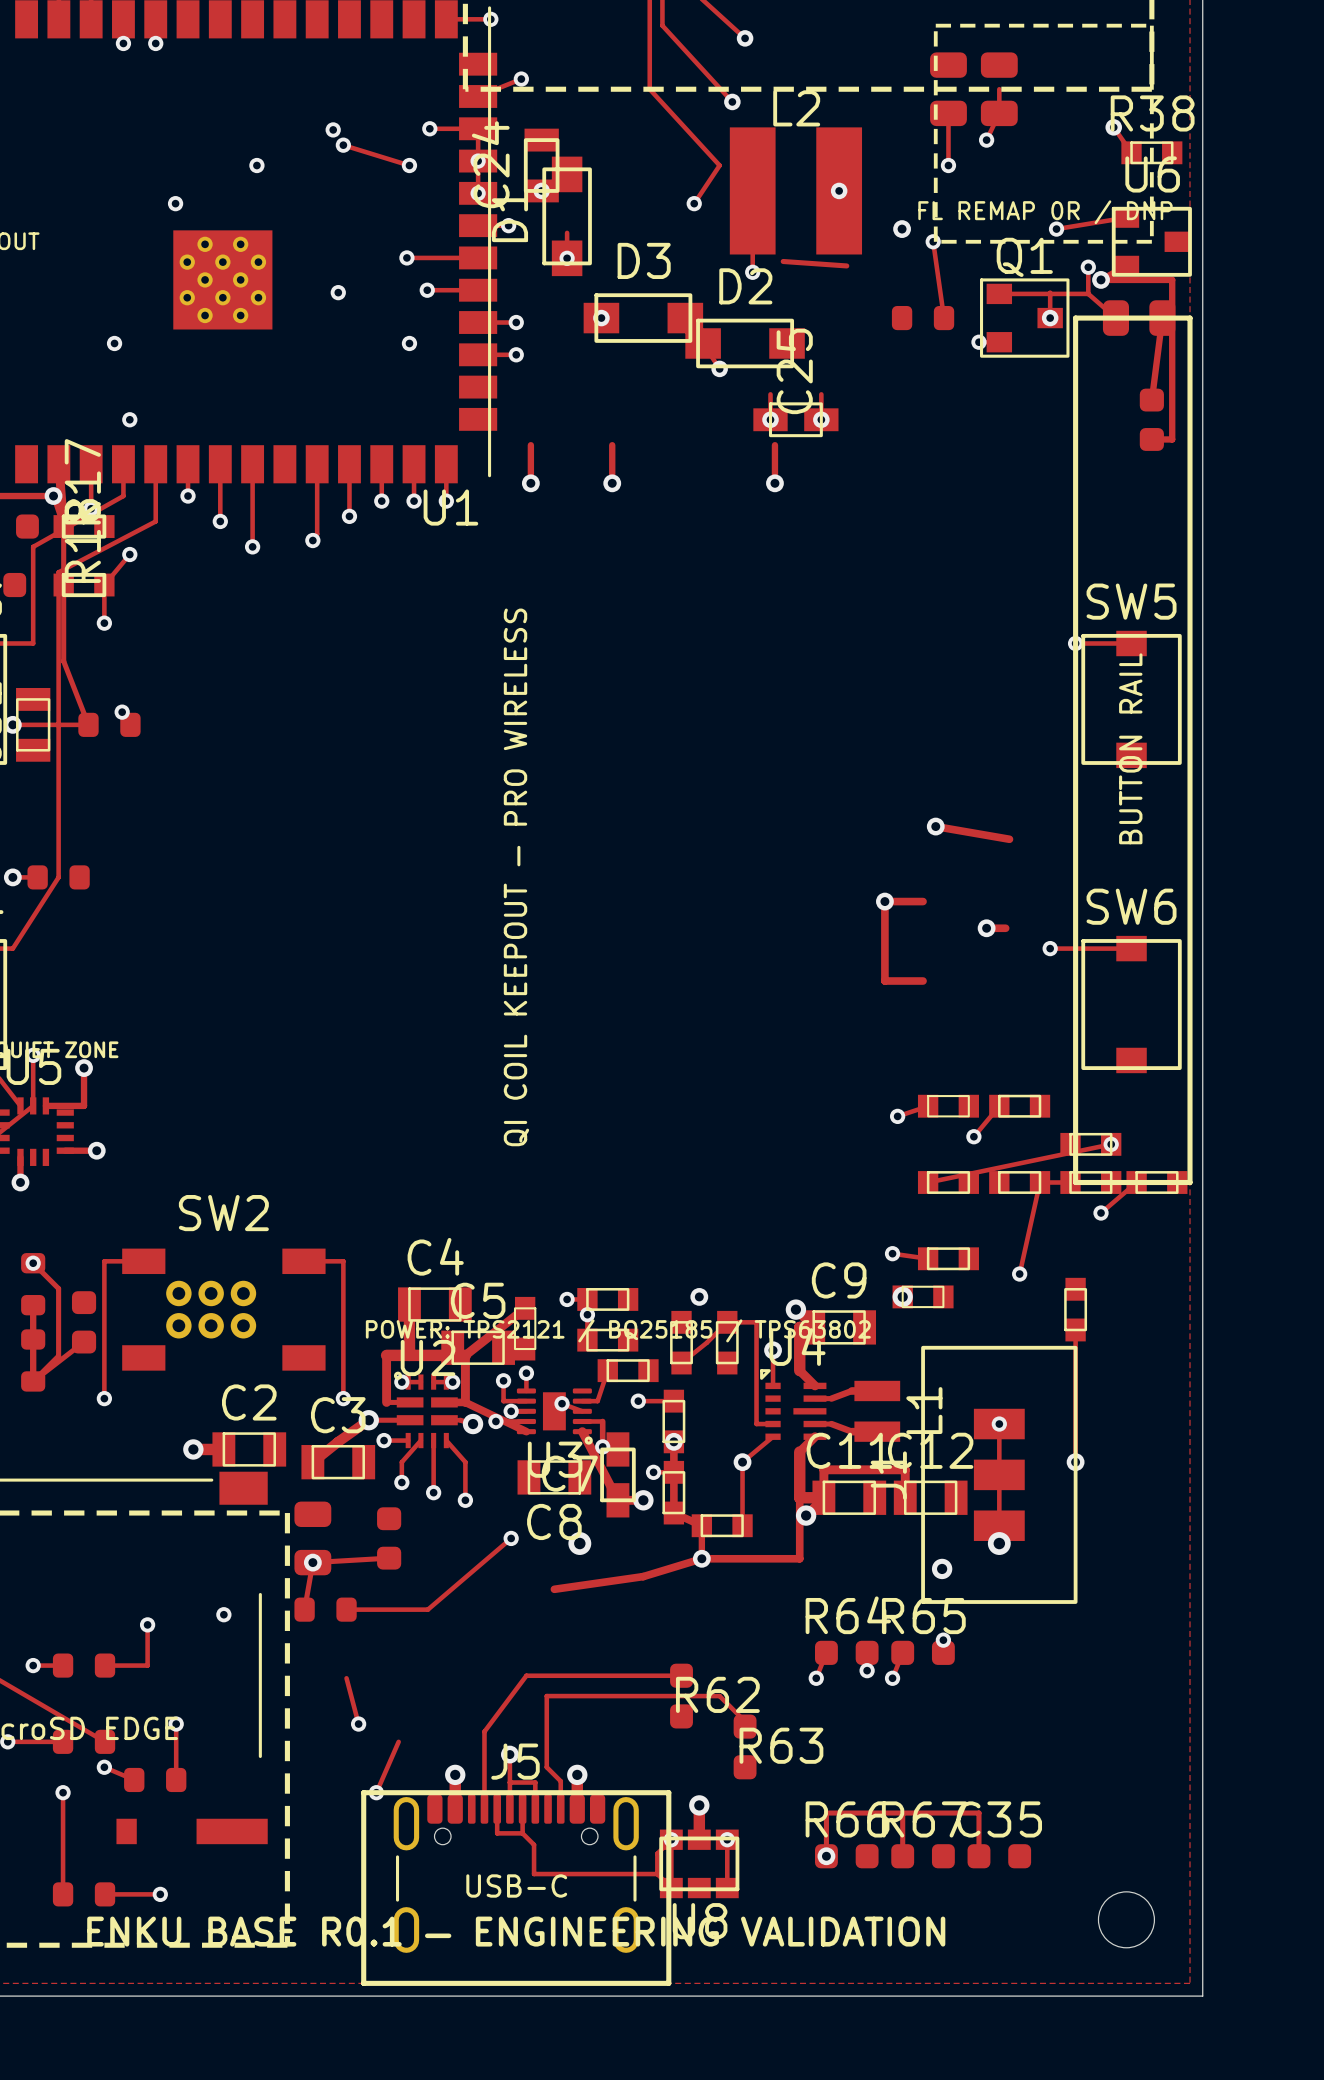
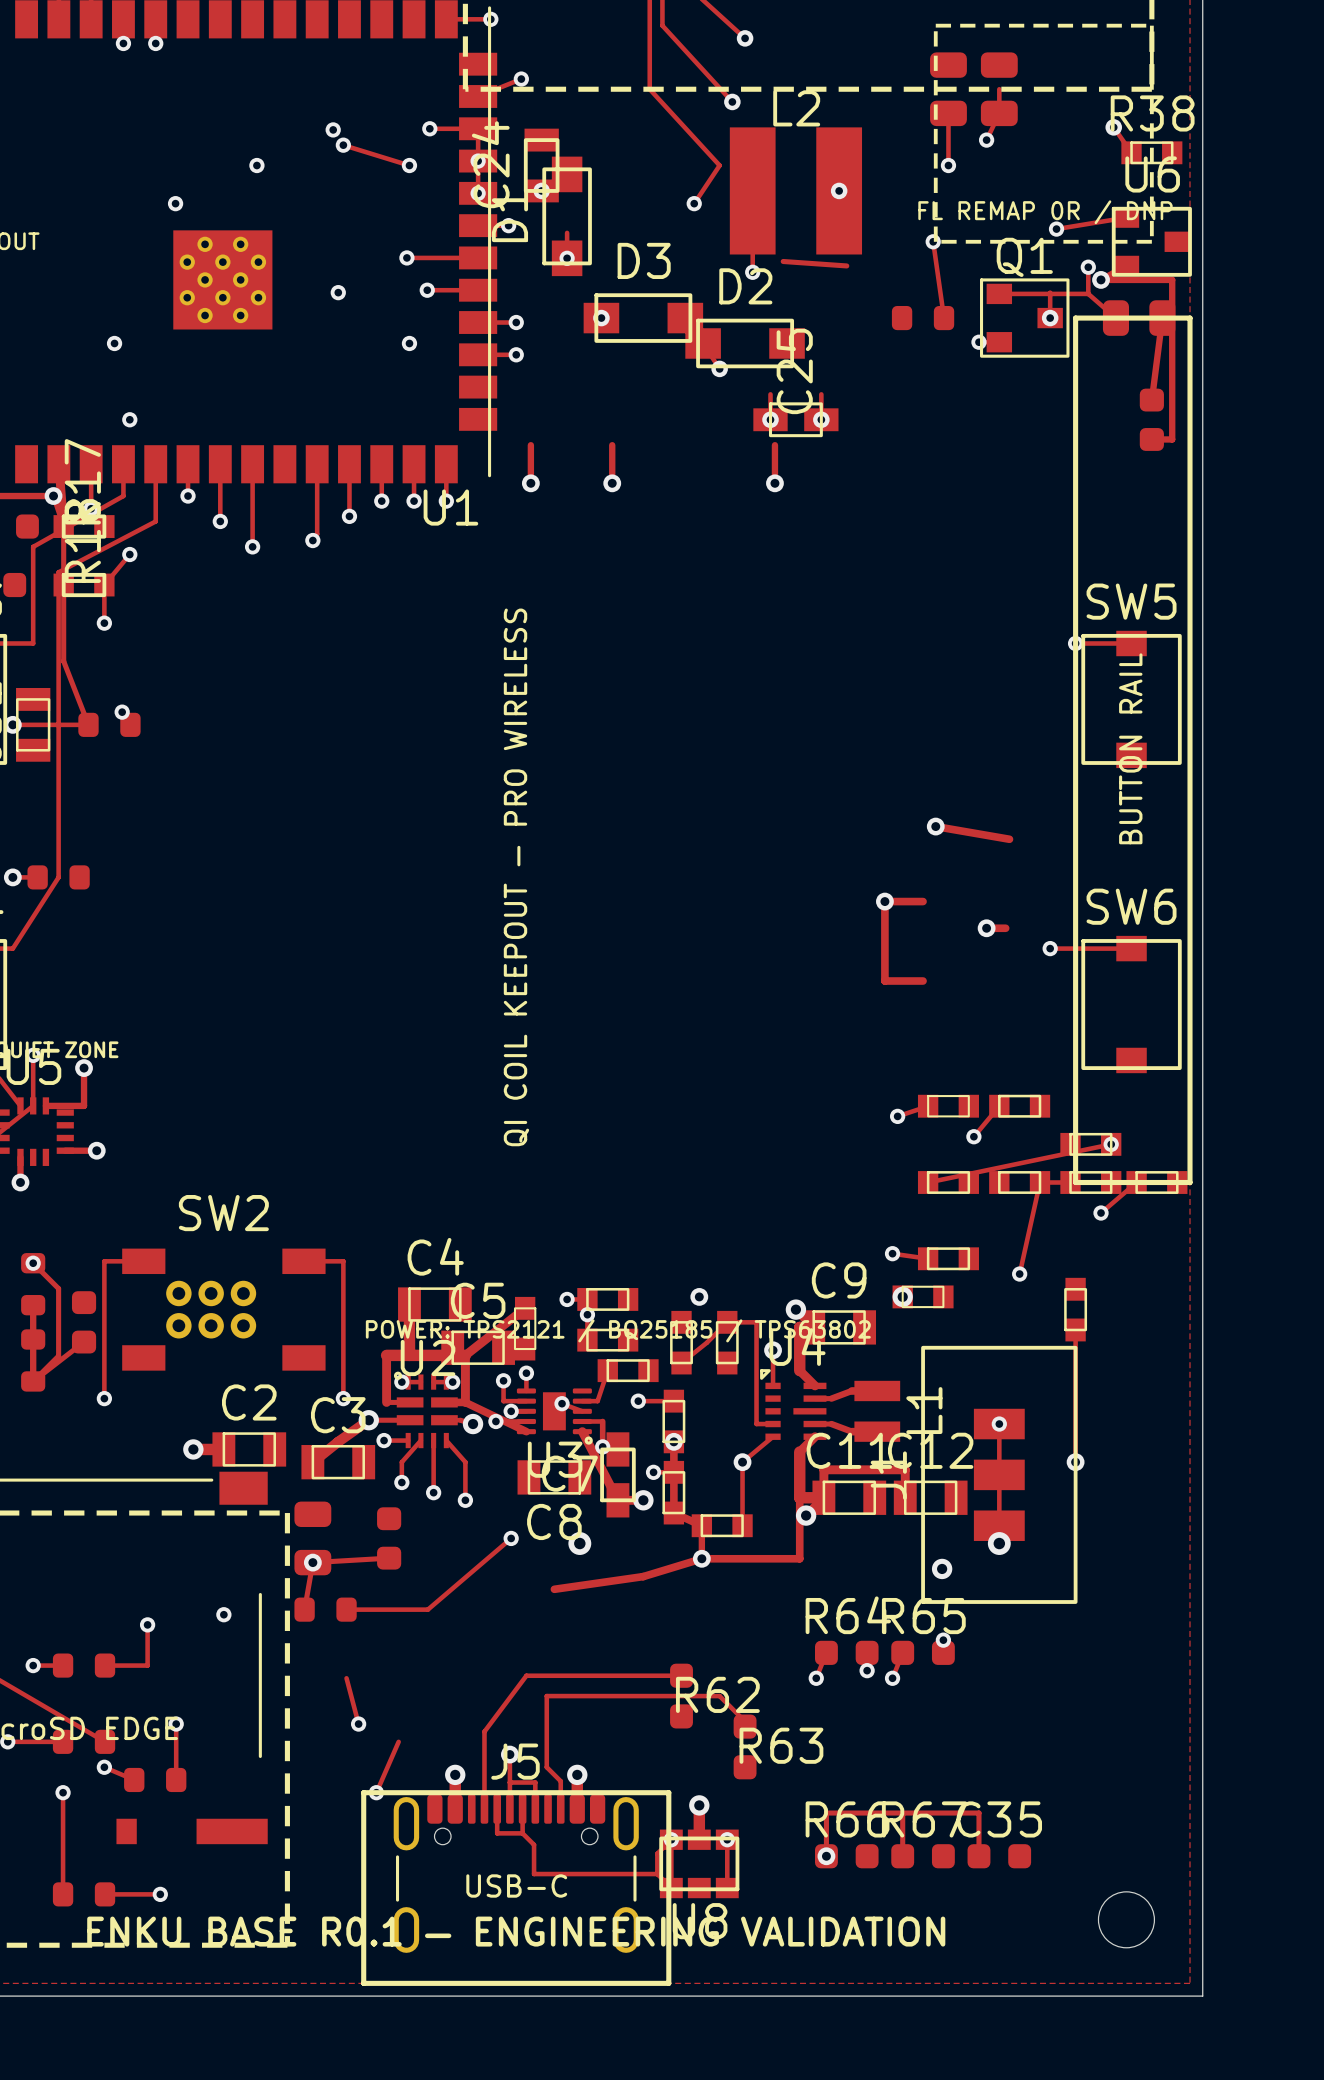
via: (902, 229) -> none

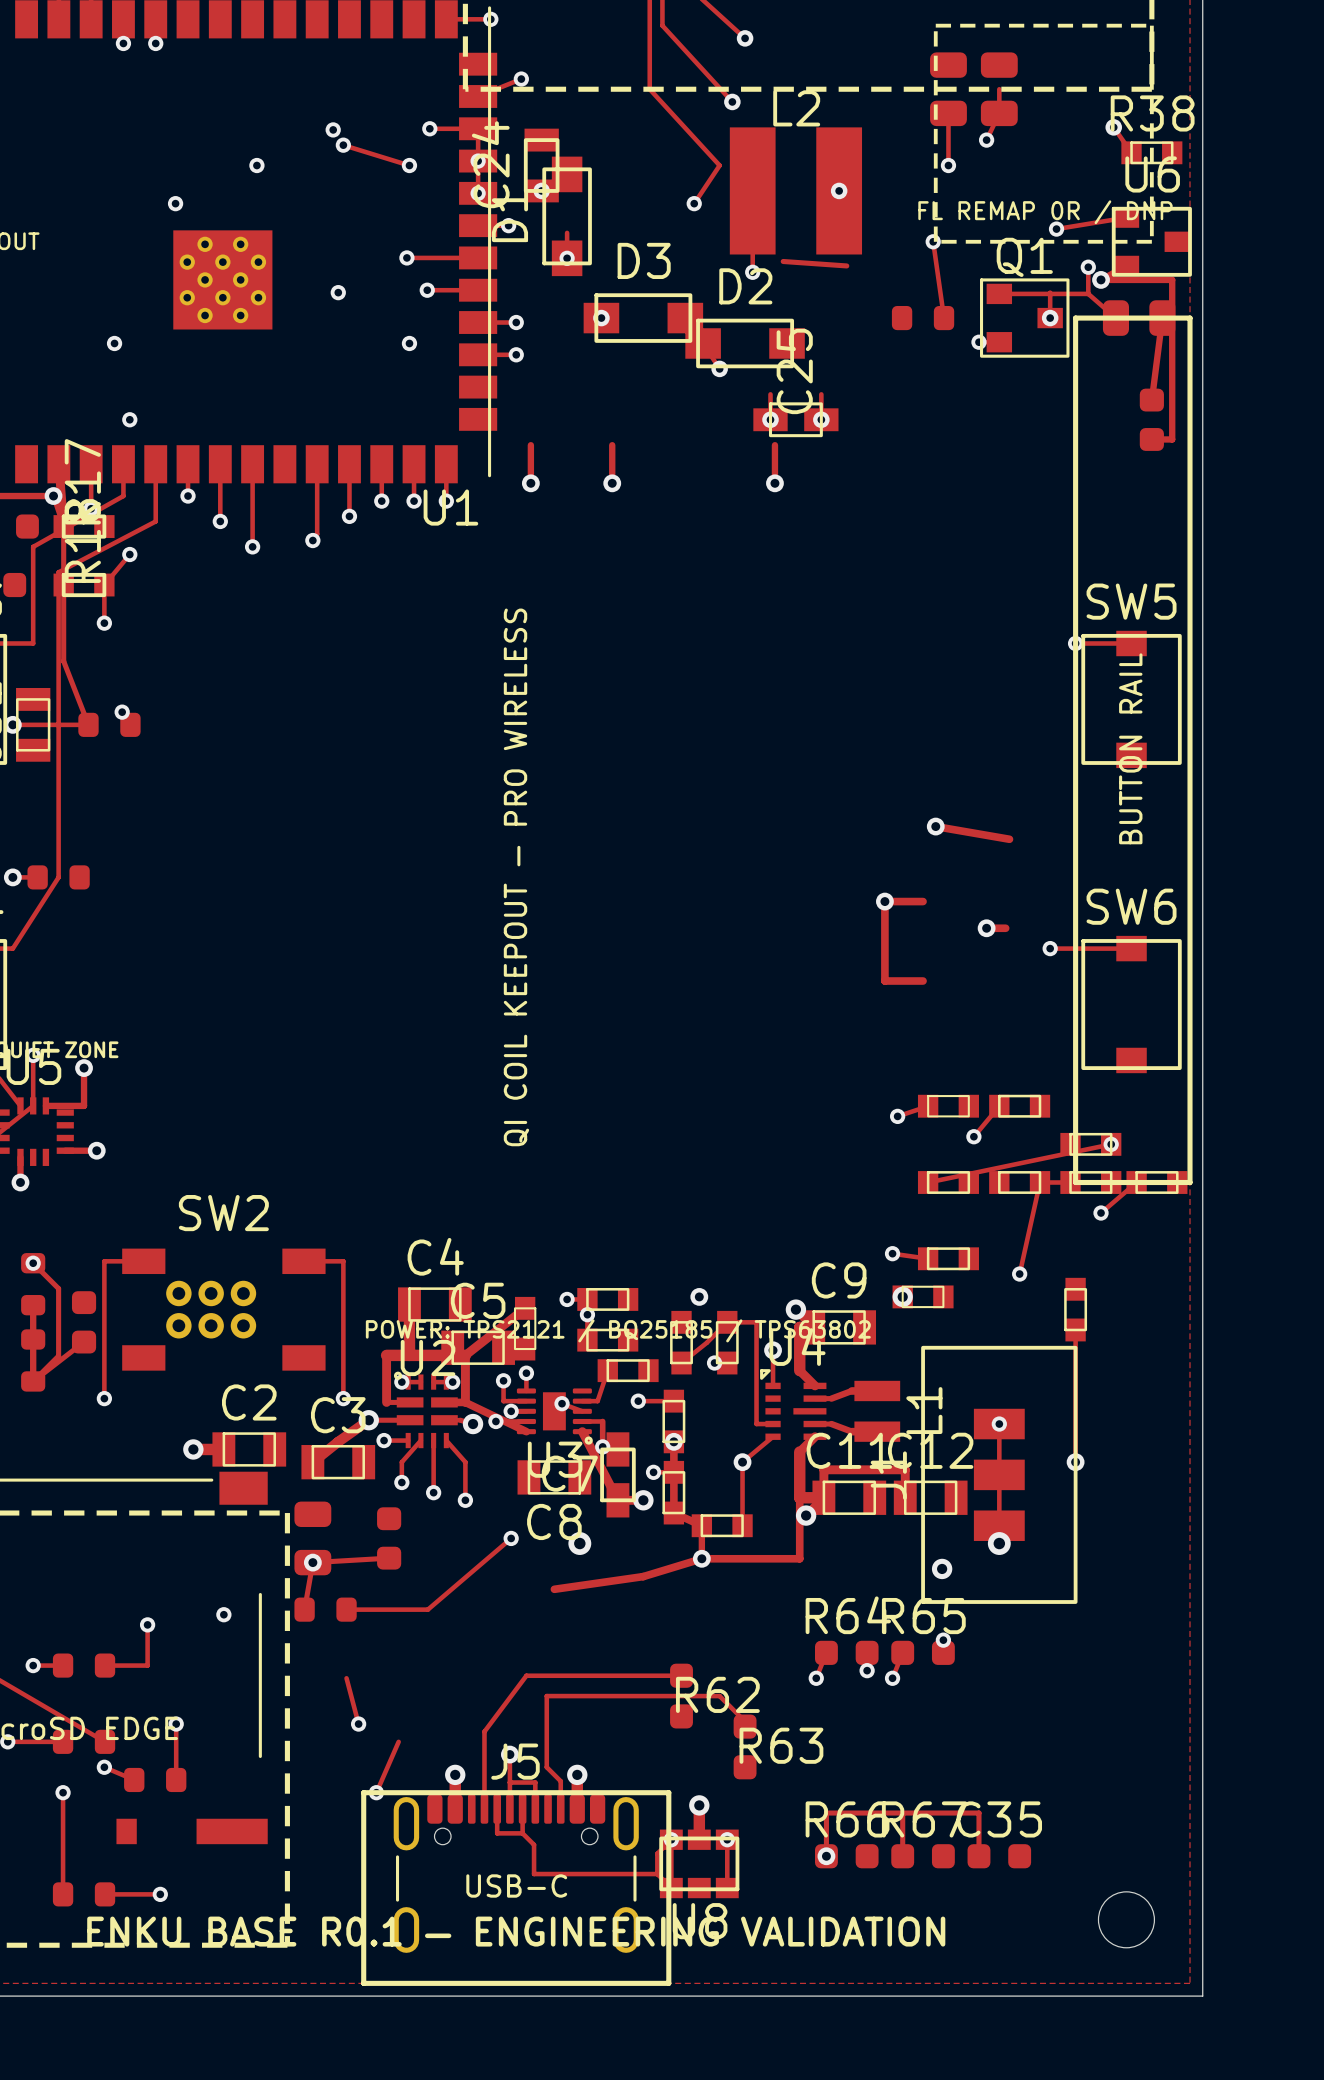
via: none -> (714, 1363)

